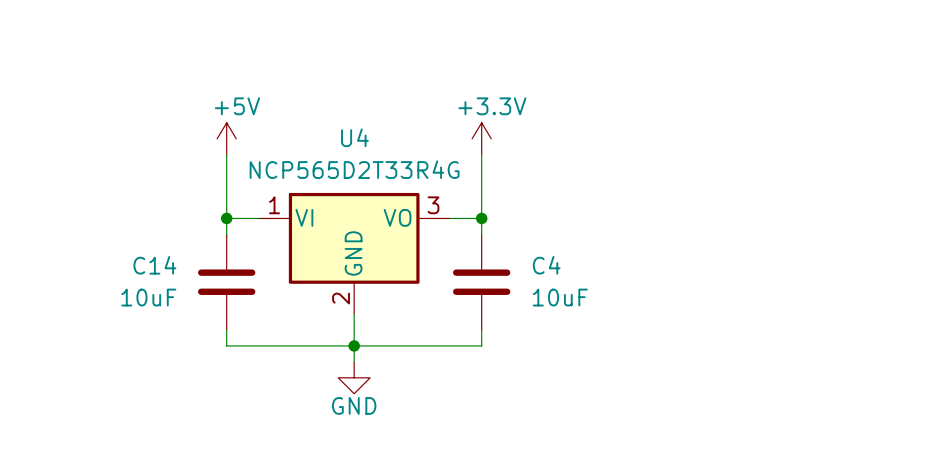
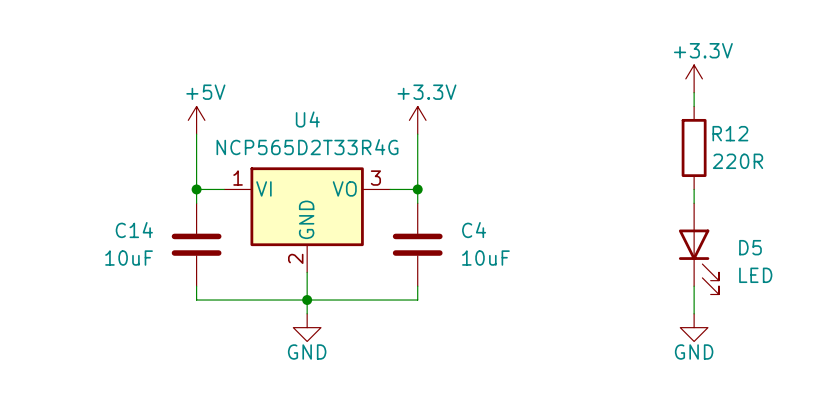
power symbol: none -> +3.3V (694, 78)
wire: none -> (694, 92) (694, 106)
R12: none -> 220R (694, 147)
wire: none -> (694, 189) (694, 203)
D5: none -> LED (698, 248)
wire: none -> (694, 286) (694, 313)
power symbol: none -> GND (694, 327)

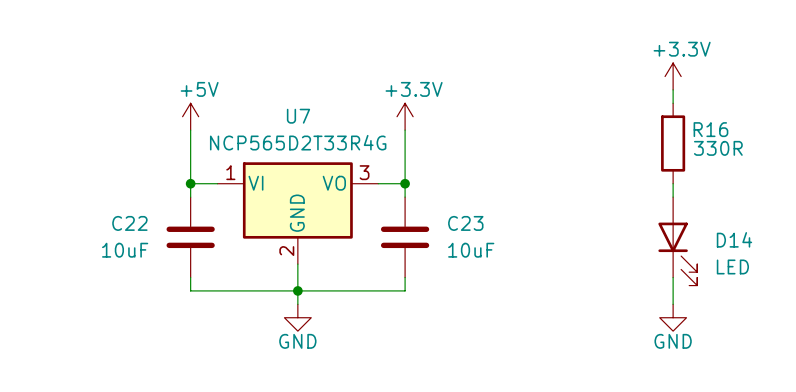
U4 name: U4 (307, 119) -> U7 (298, 116)
R12 name: R12 (730, 133) -> R16 (710, 129)
R12 value: 220R (738, 161) -> 330R (718, 148)
C14 name: C14 (134, 230) -> C22 (129, 223)
C4 name: C4 (474, 230) -> C23 (465, 223)
D5 name: D5 (750, 247) -> D14 (734, 239)

